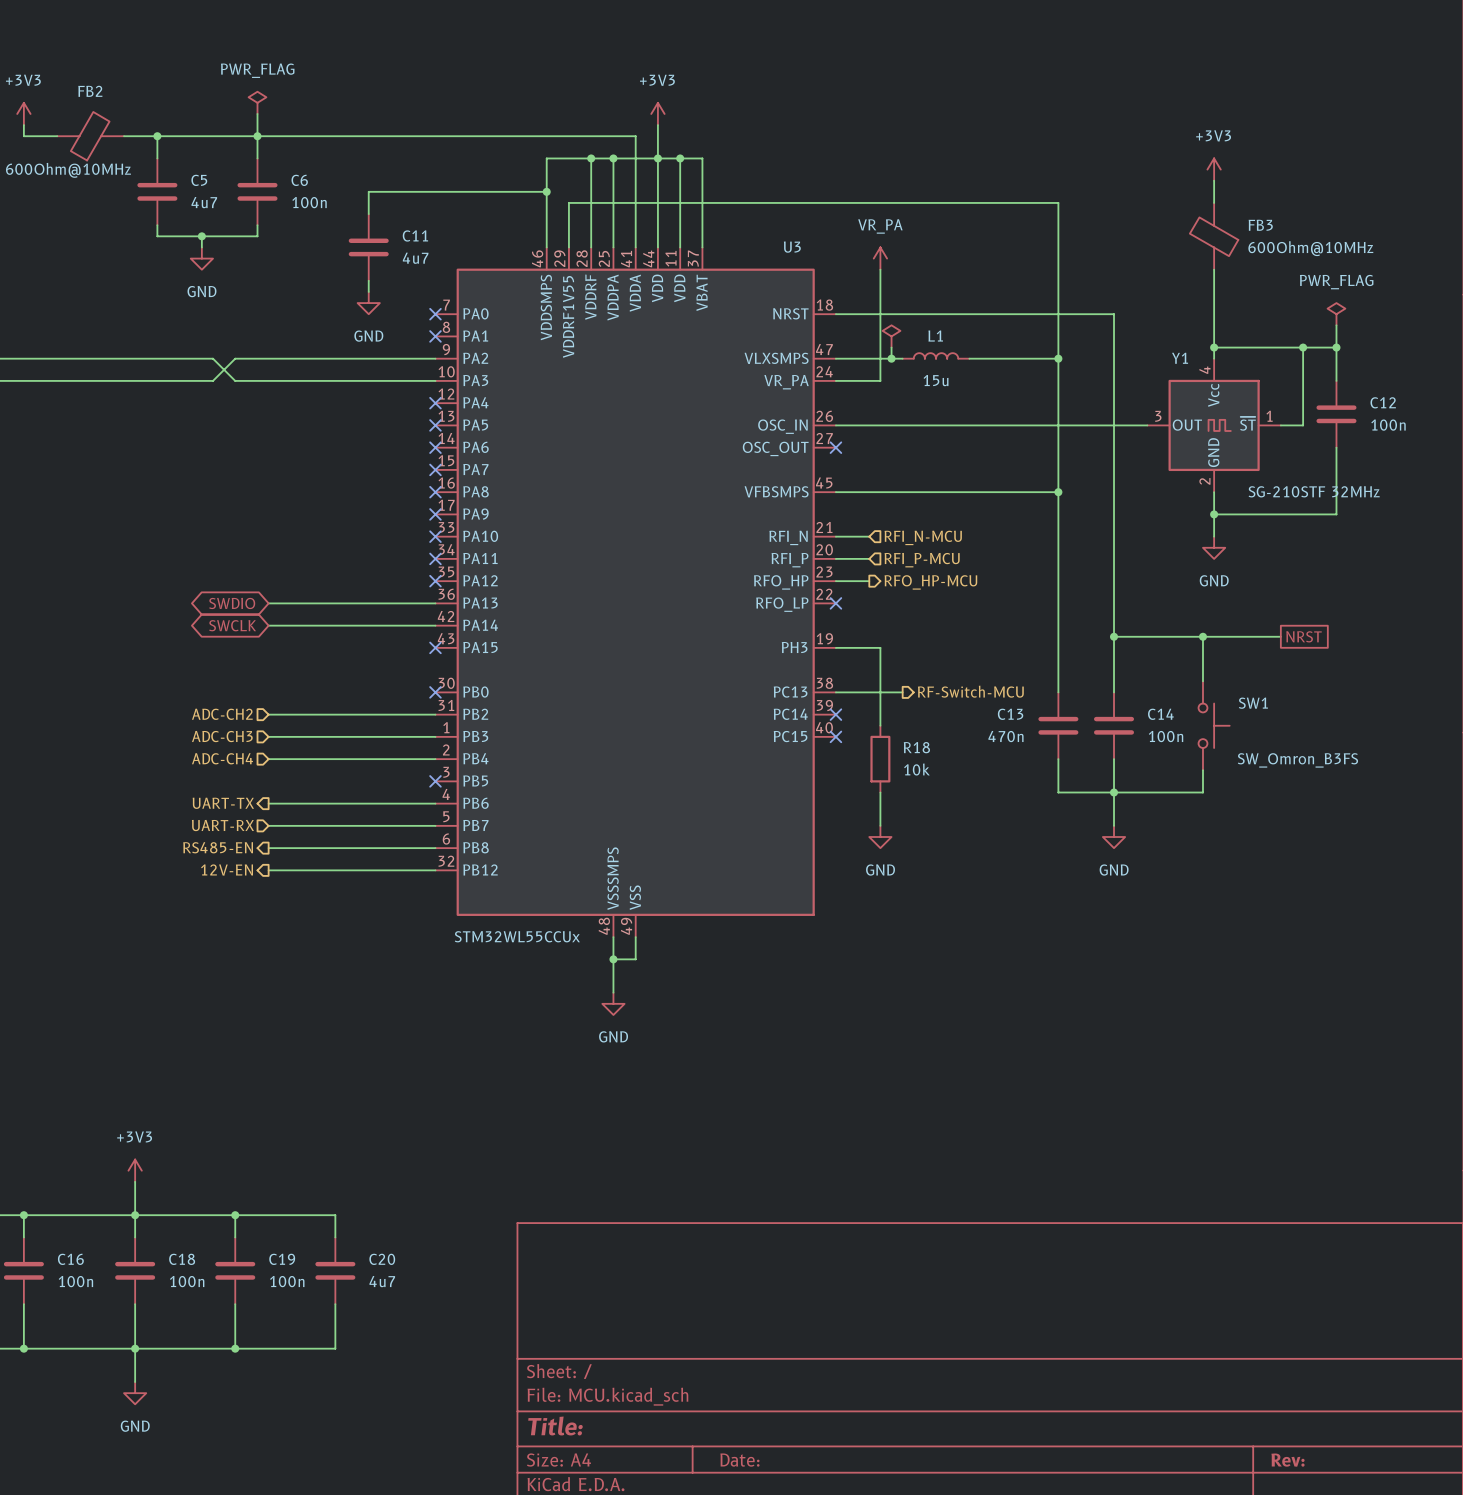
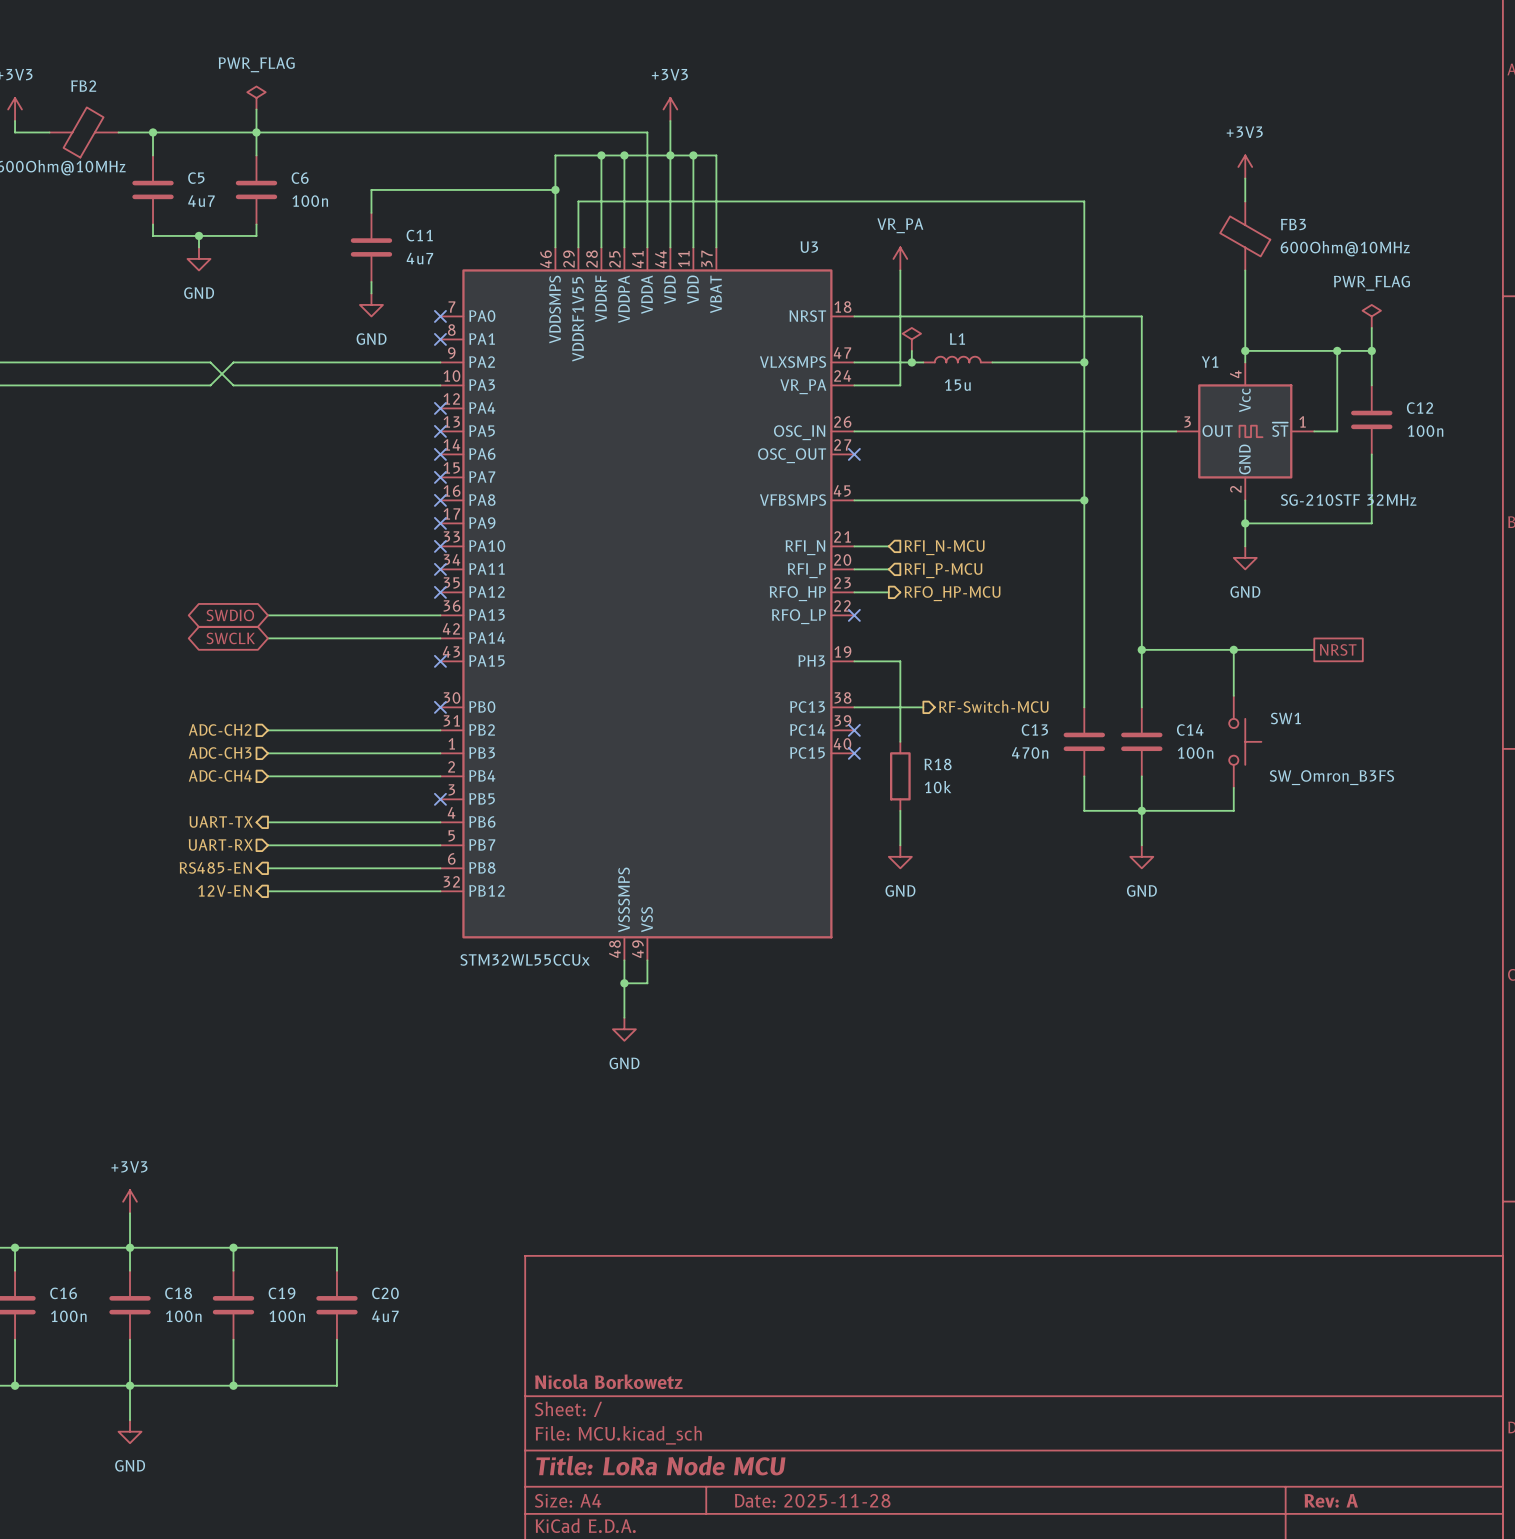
title block: none -> Nicola Borkowetz (608, 1381)
title block: Title: (555, 1426) -> Title: LoRa Node MCU (660, 1465)
title block: Date: (739, 1460) -> Date: 2025-11-28 (812, 1500)
title block: Rev: (1287, 1460) -> Rev: A (1331, 1500)

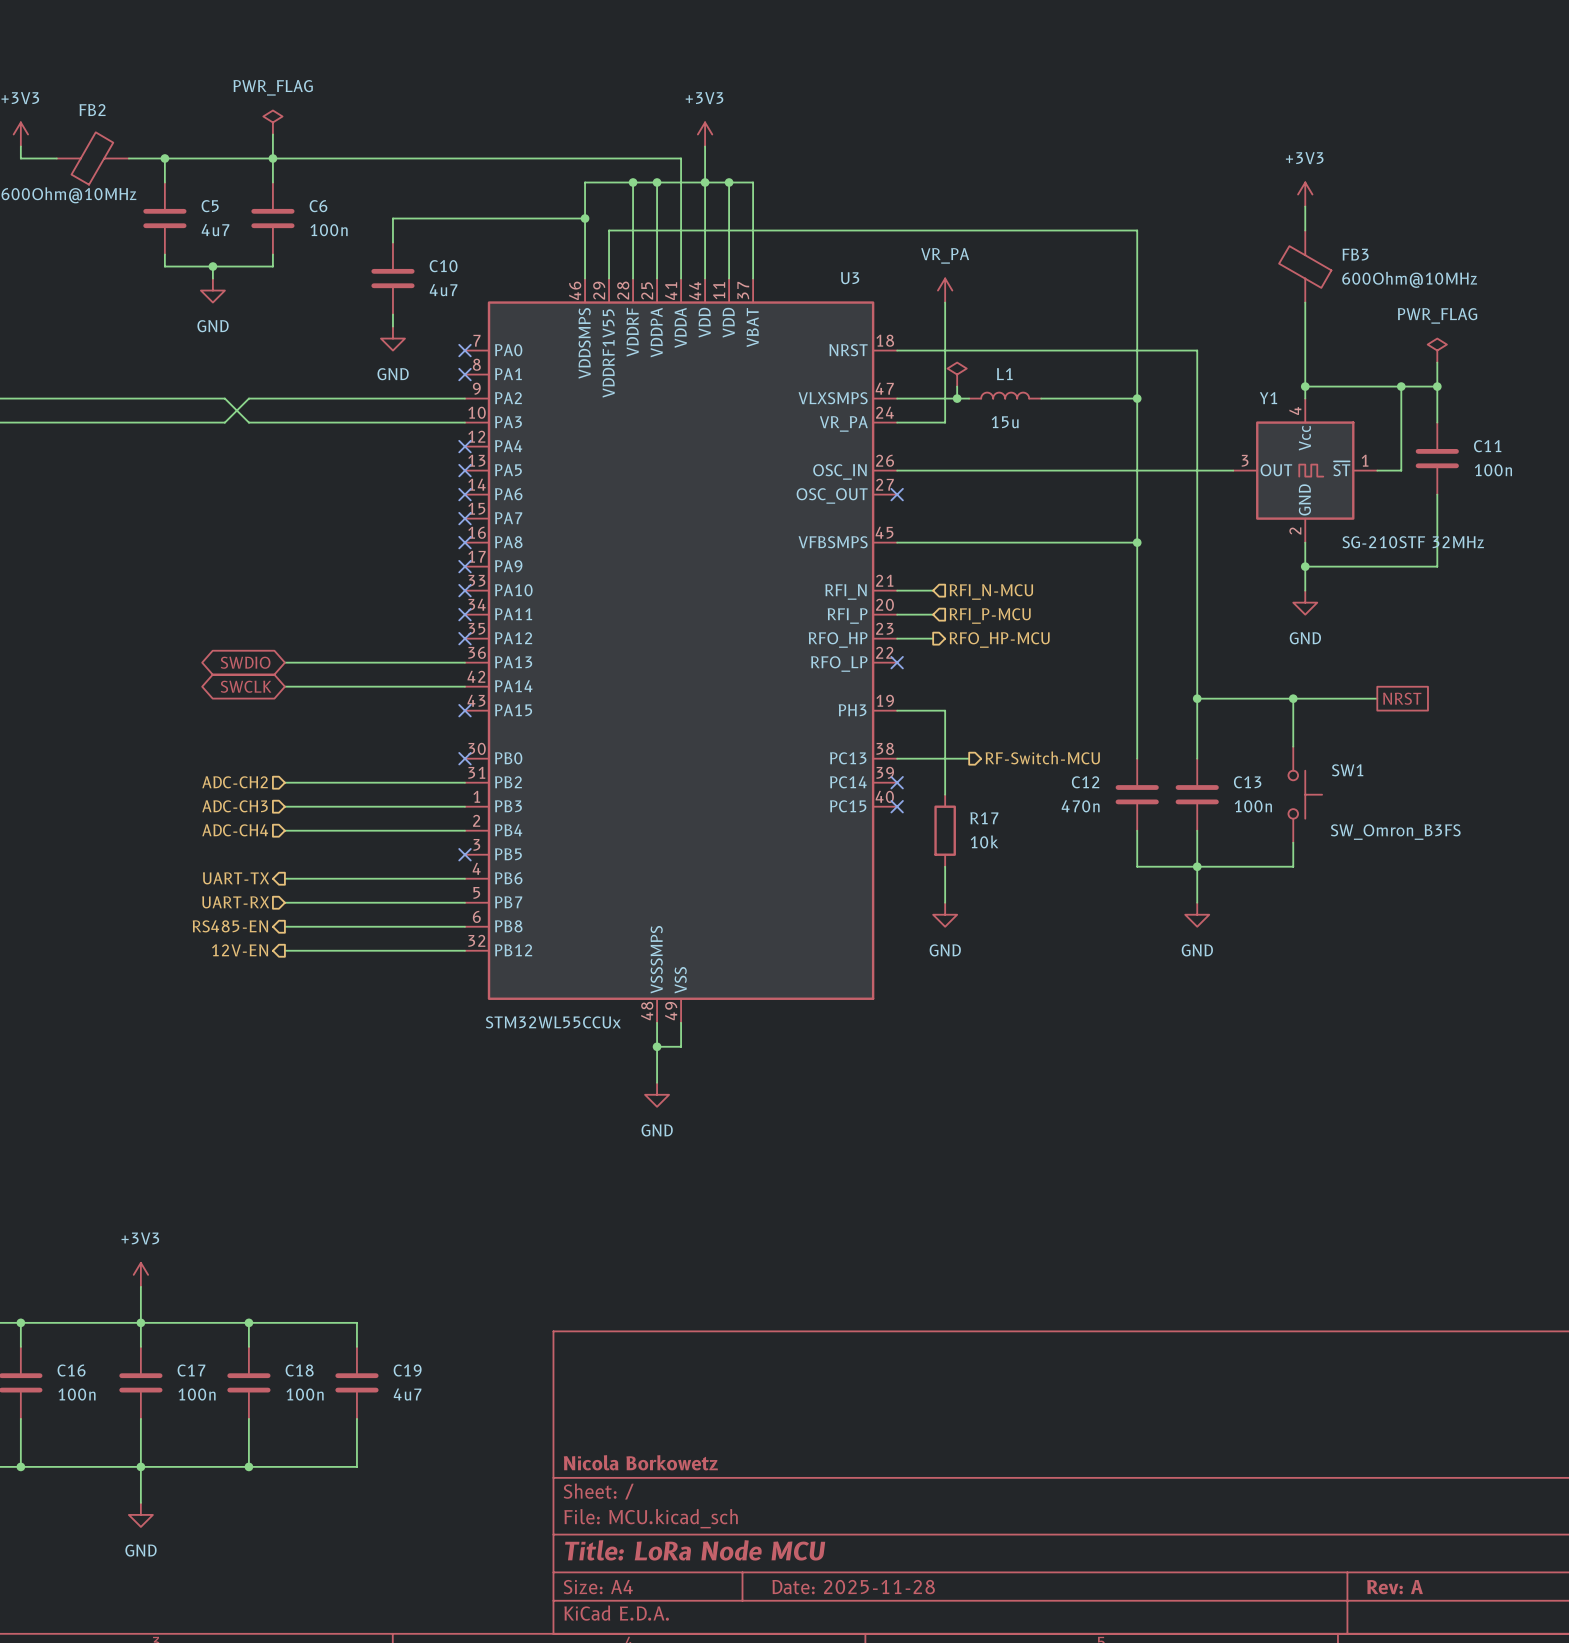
C11 name: C11 (419, 235) -> C10 (443, 266)
C12 name: C12 (1420, 408) -> C11 (1487, 446)
C13 name: C13 (1034, 729) -> C12 (1085, 782)
C14 name: C14 (1190, 729) -> C13 (1247, 782)
R18 name: R18 (938, 764) -> R17 (984, 818)
C18 name: C18 (178, 1293) -> C17 (191, 1370)
C19 name: C19 (282, 1293) -> C18 (299, 1370)
C20 name: C20 (385, 1293) -> C19 (407, 1370)

